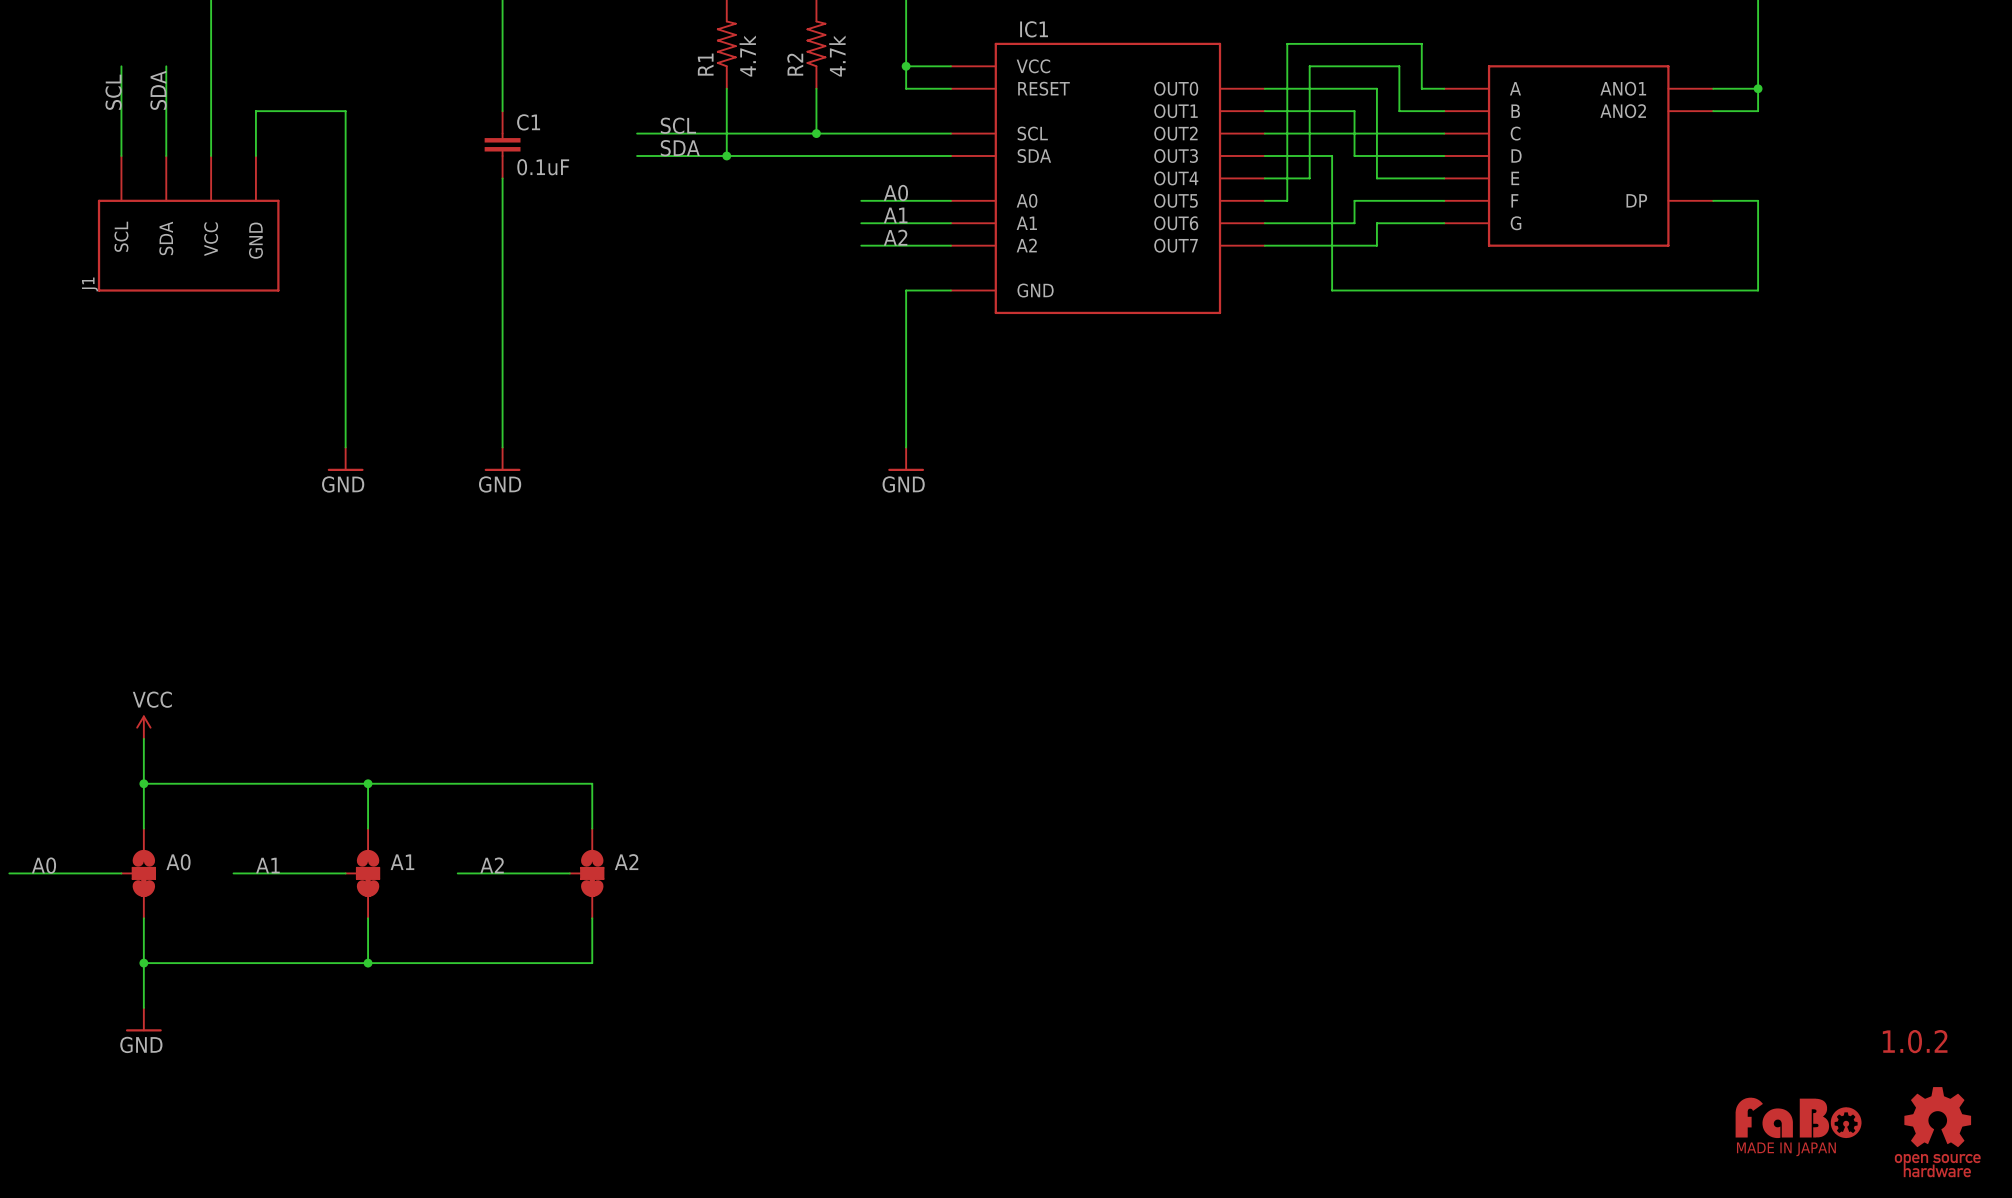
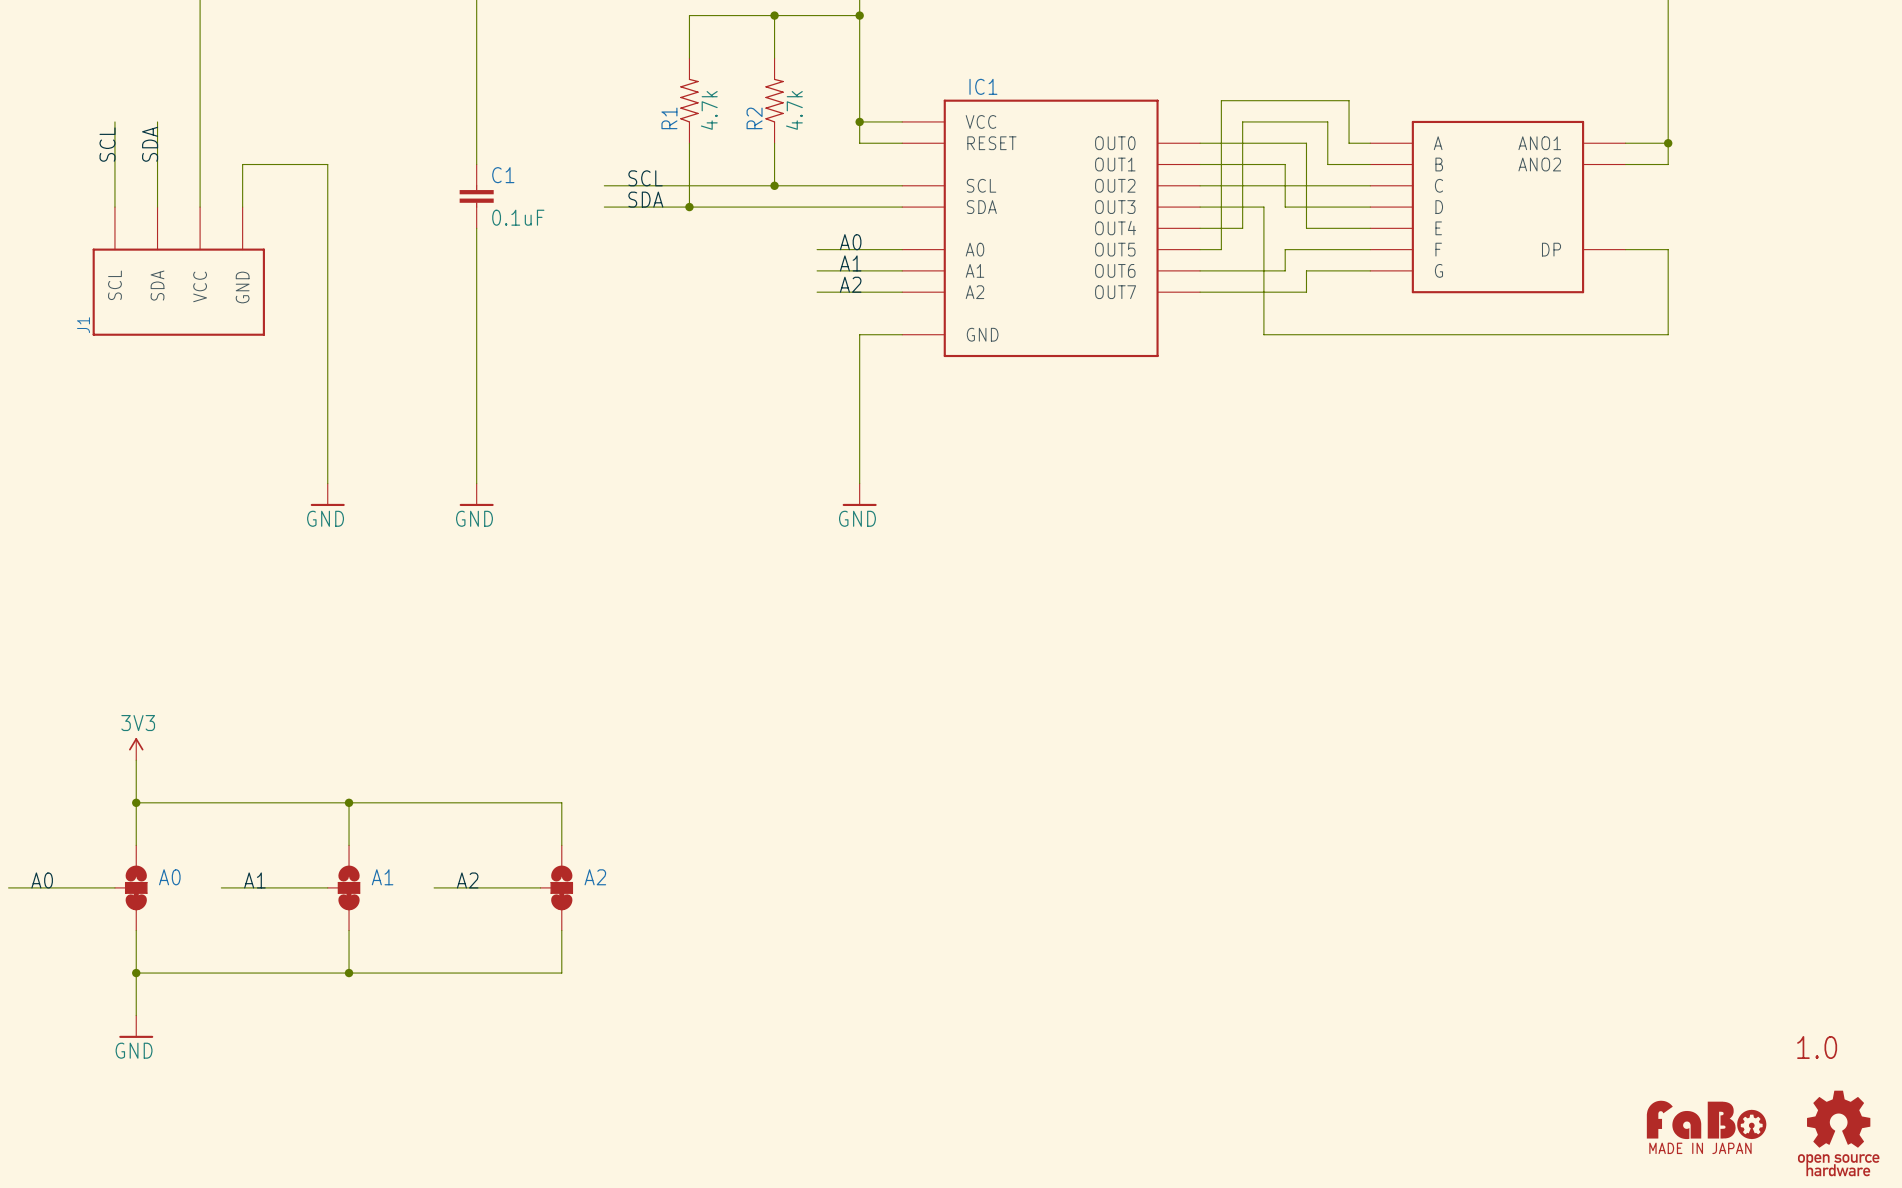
power symbol: VCC (143, 727) -> 3V3 (136, 749)
text: 1.0.2 (1915, 1041) -> 1.0 (1817, 1047)

